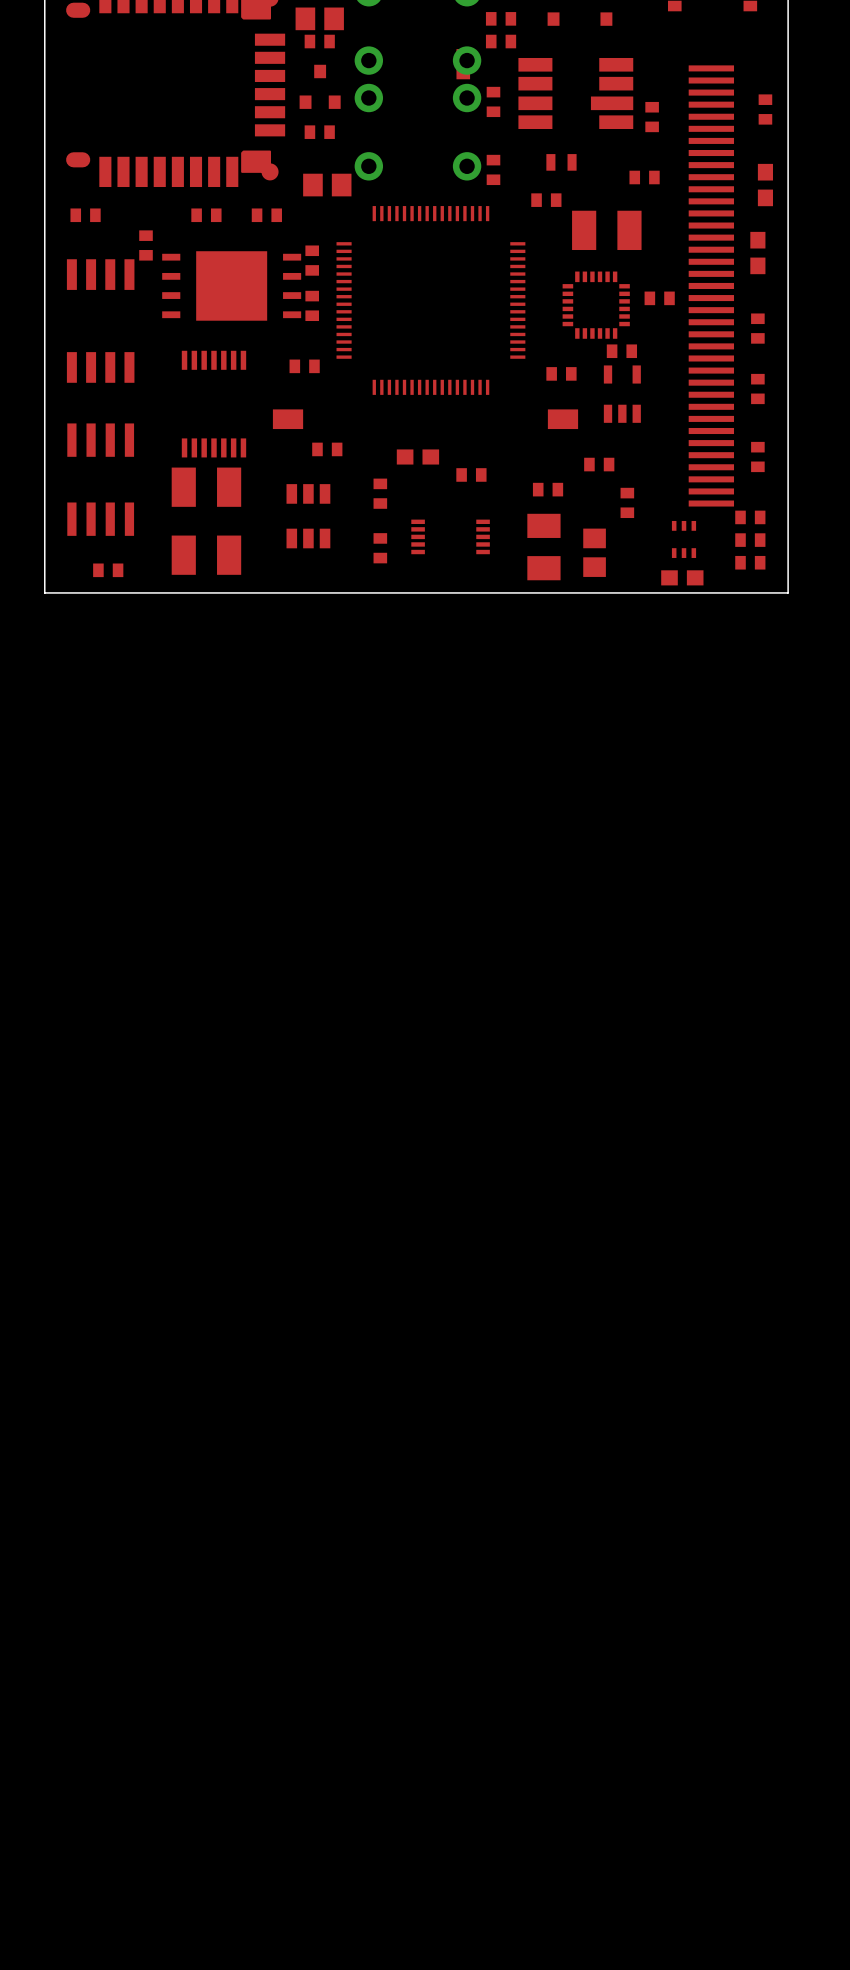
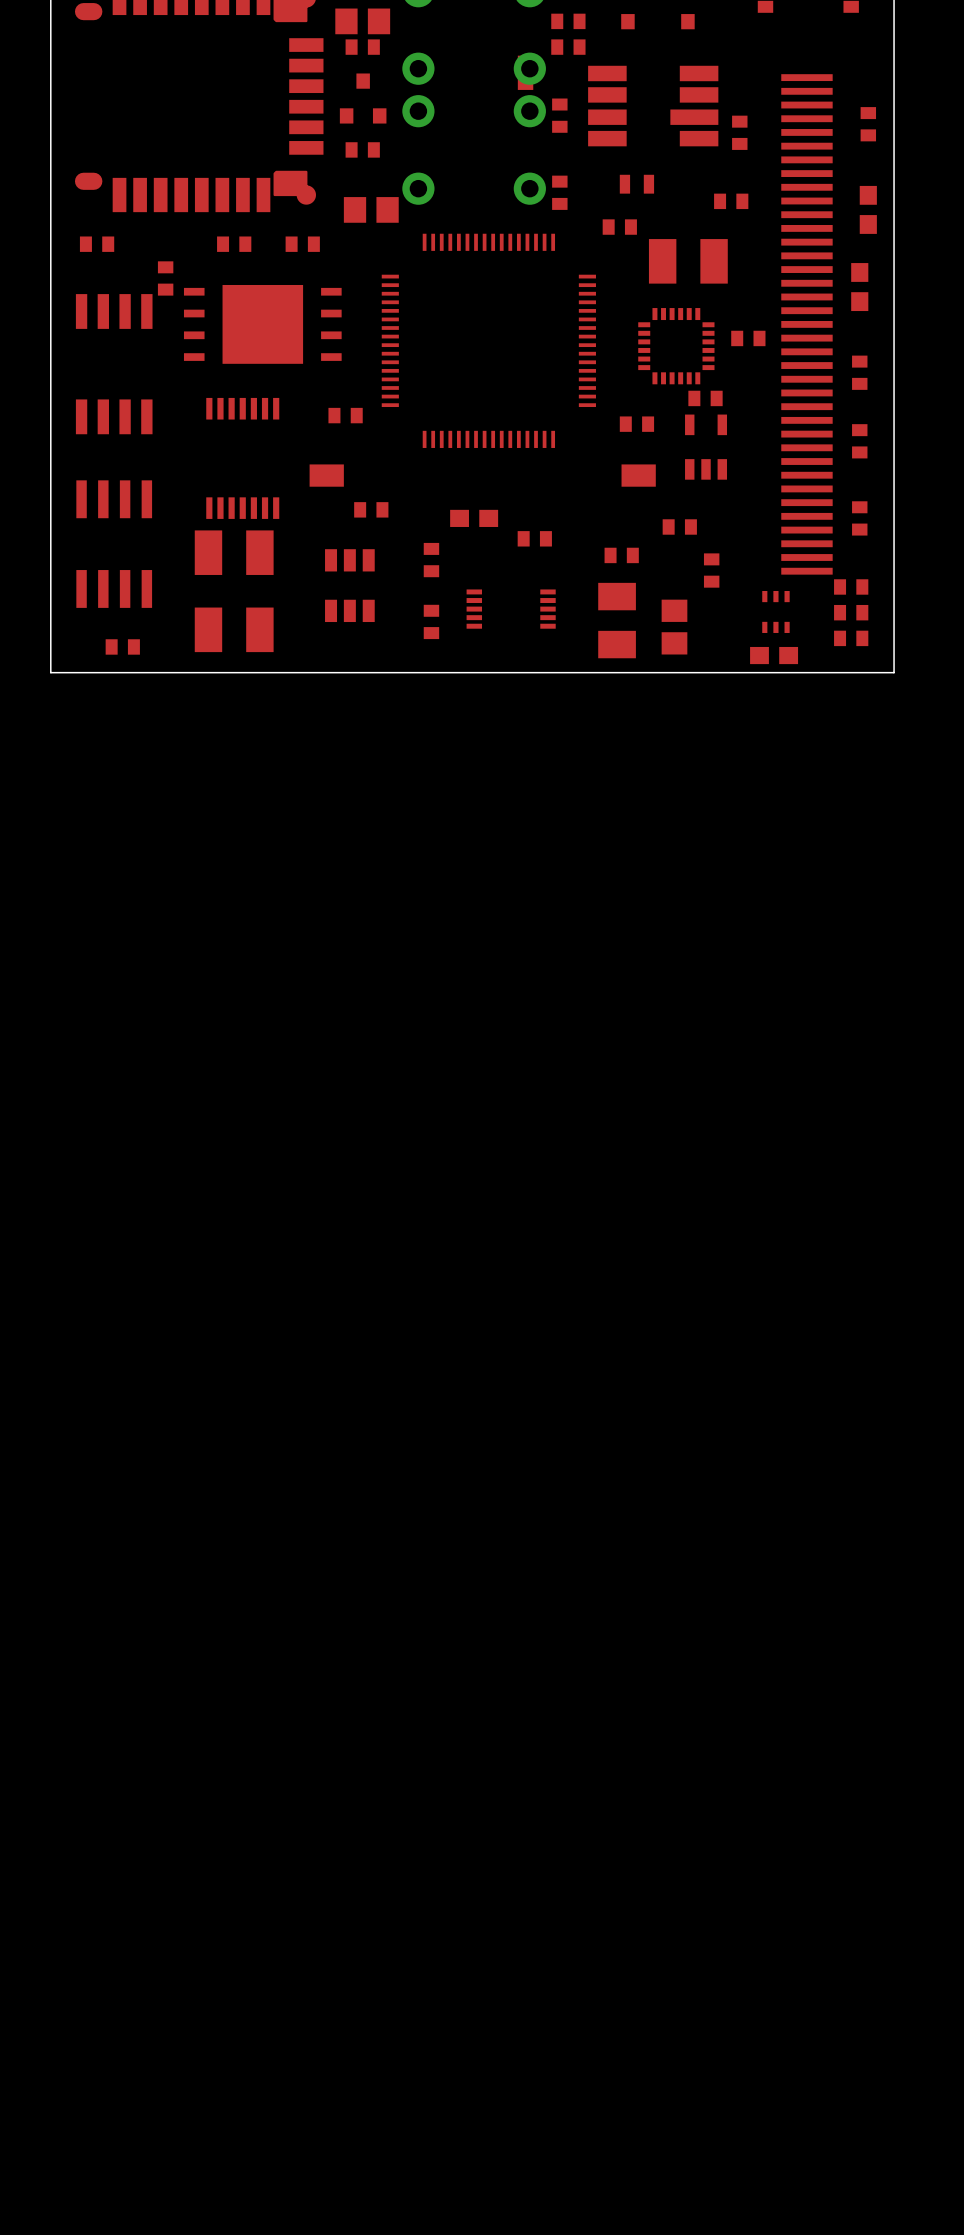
part: (312, 260) -> none
part: (312, 305) -> none

